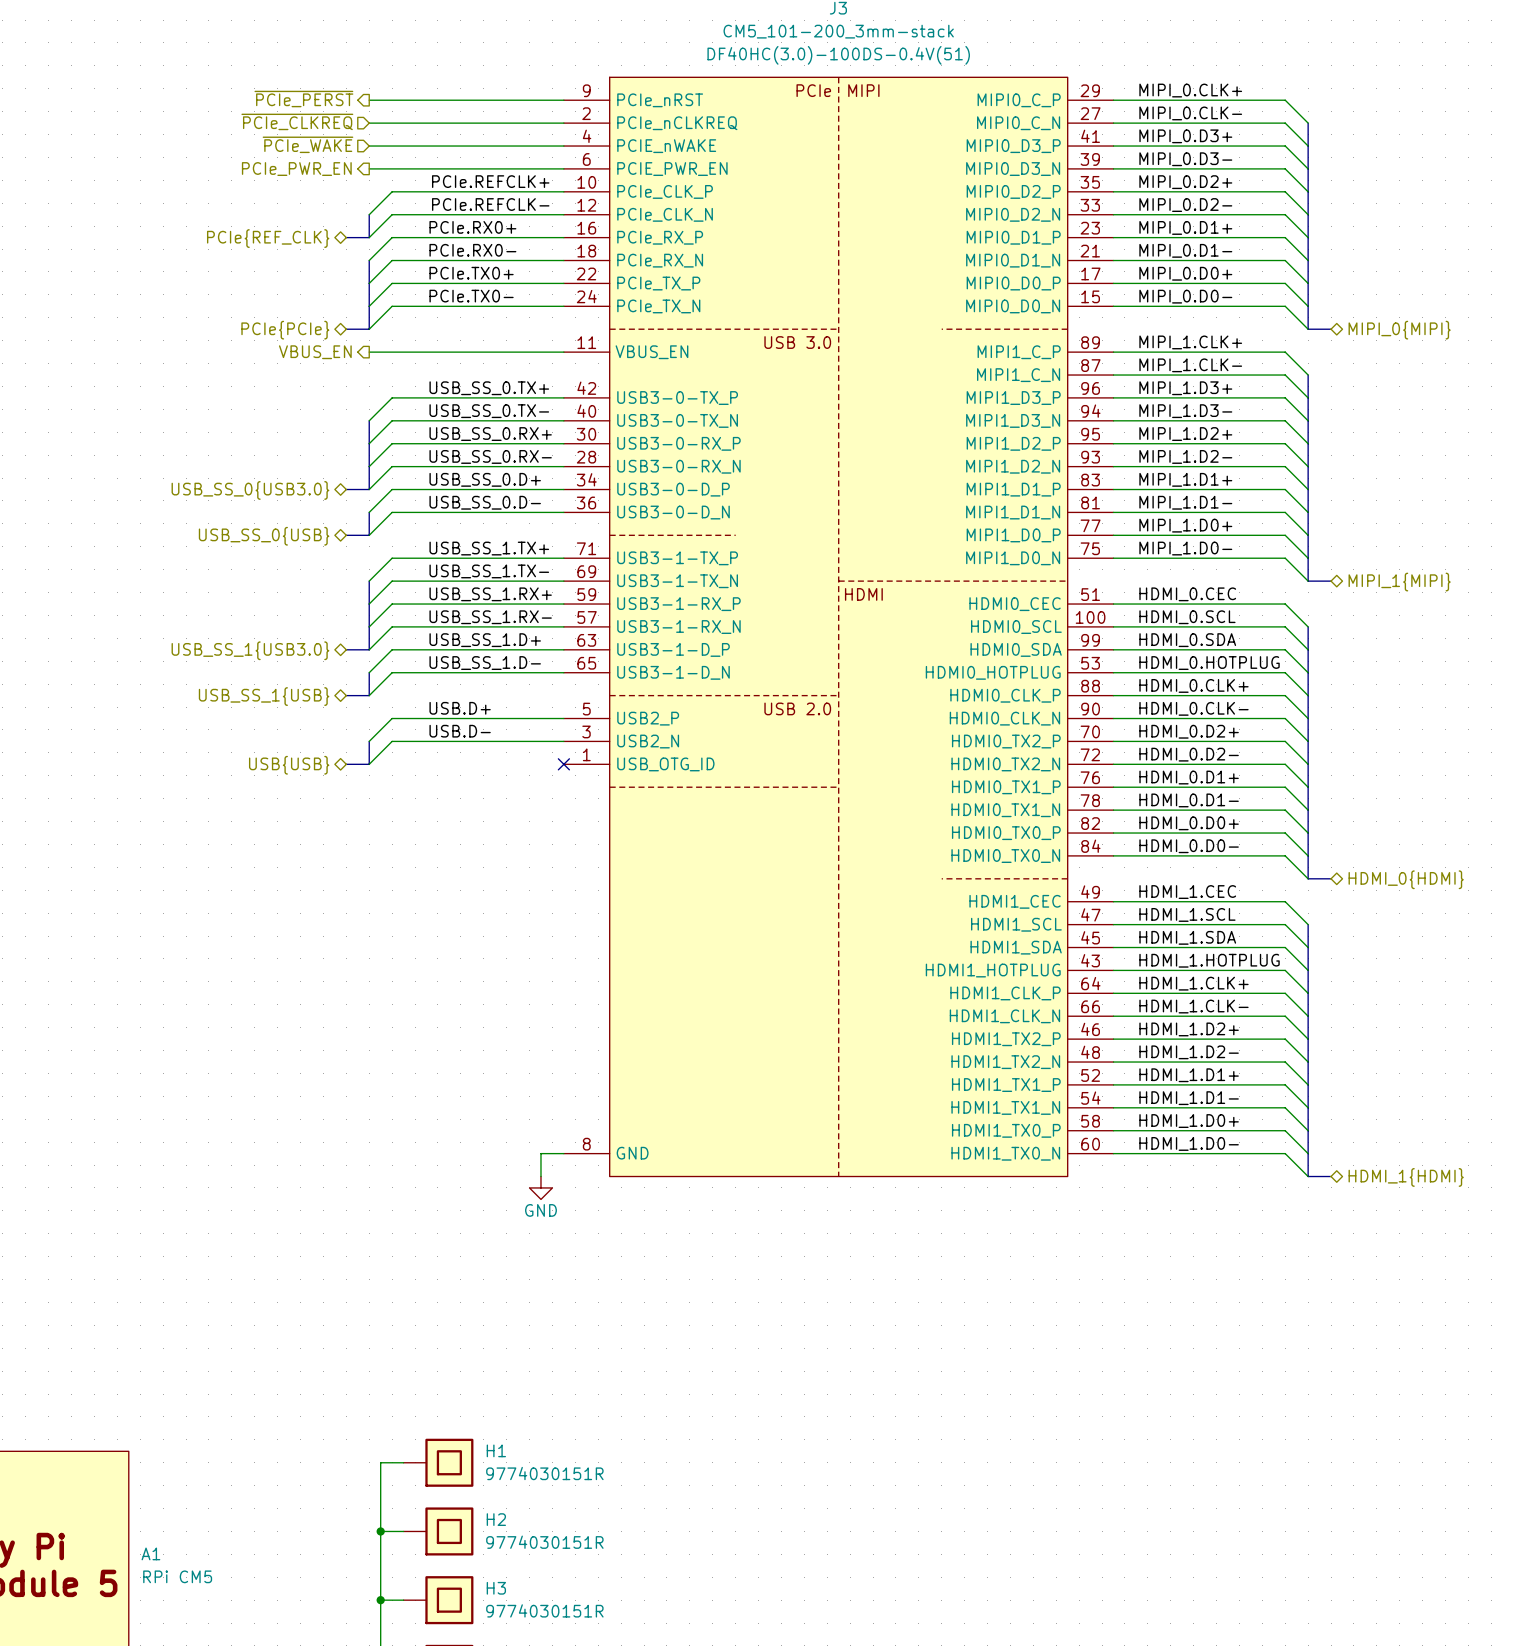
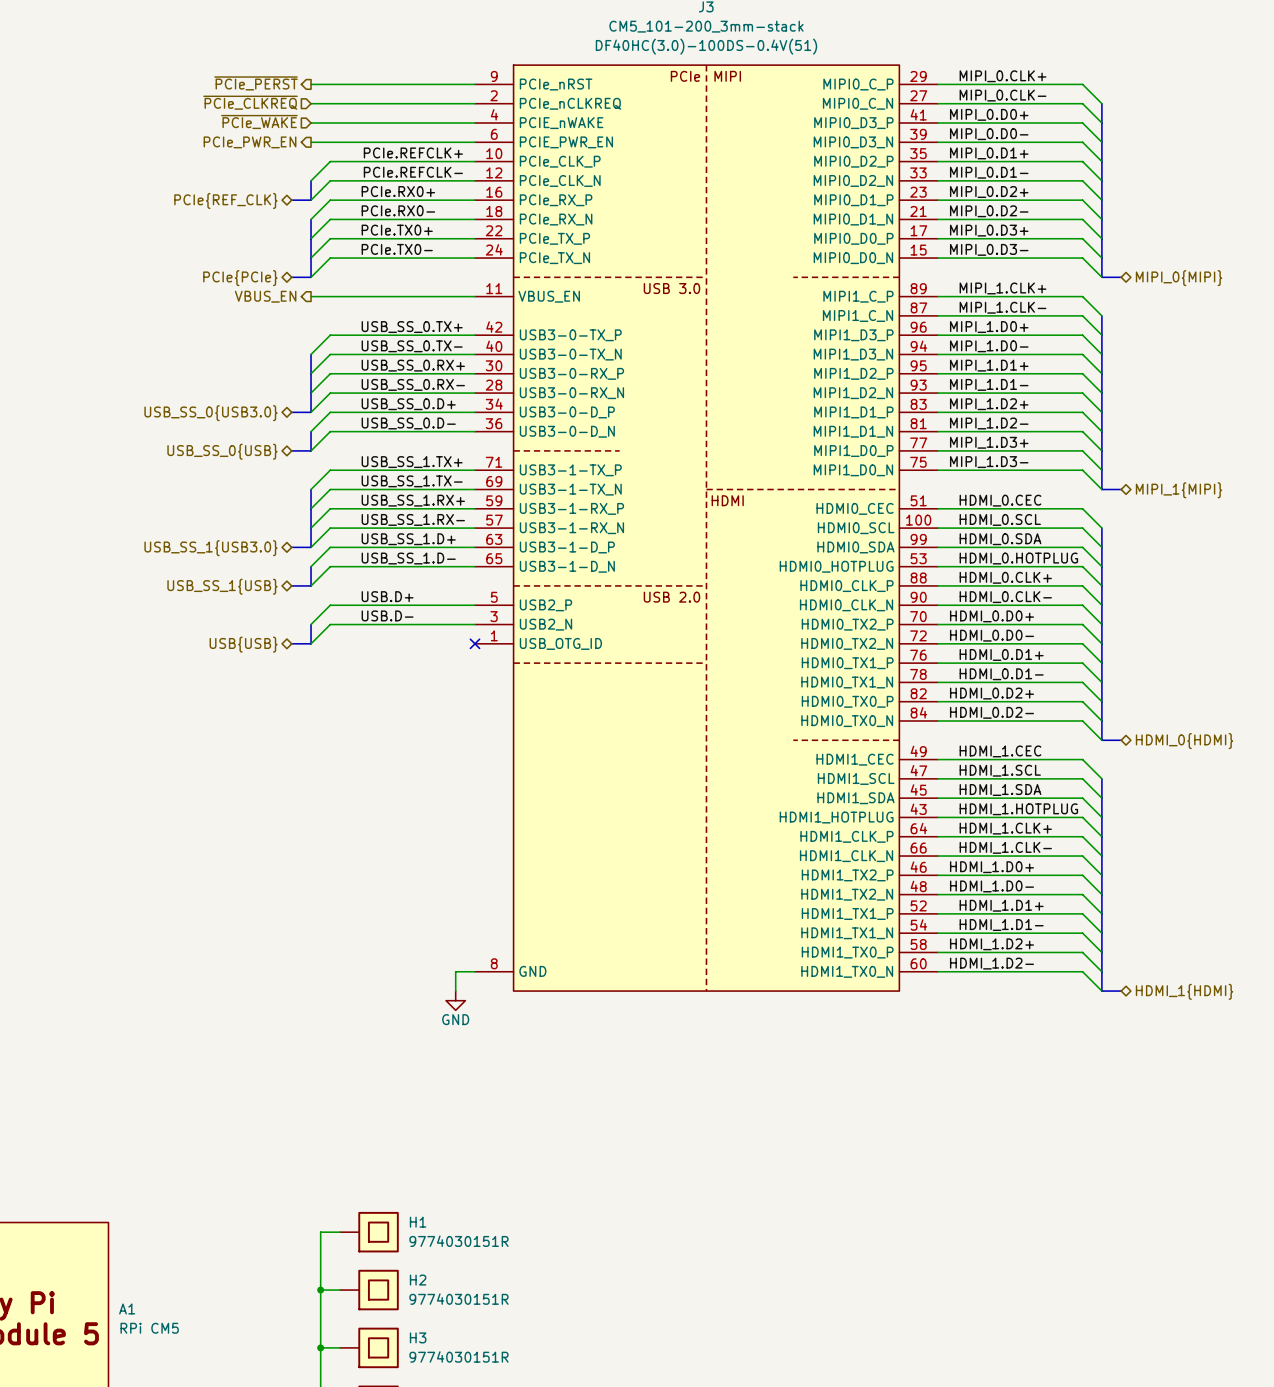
label position: MIPI_0.D3+ (1185, 136) -> MIPI_0.D3+ (989, 230)
label position: MIPI_0.D3- (1185, 159) -> MIPI_0.D3- (989, 249)
label position: MIPI_0.D2+ (1185, 182) -> MIPI_0.D2+ (989, 192)
label position: MIPI_0.D2- (1185, 205) -> MIPI_0.D2- (989, 211)
label position: MIPI_0.D1+ (1185, 227) -> MIPI_0.D1+ (989, 153)
label position: MIPI_0.D1- (1185, 250) -> MIPI_0.D1- (989, 172)
label position: MIPI_0.D0+ (1185, 273) -> MIPI_0.D0+ (989, 114)
label position: MIPI_0.D0- (1185, 296) -> MIPI_0.D0- (989, 134)
label position: MIPI_1.D3+ (1185, 388) -> MIPI_1.D3+ (989, 442)
label position: MIPI_1.D3- (1185, 411) -> MIPI_1.D3- (989, 462)
label position: MIPI_1.D2+ (1185, 434) -> MIPI_1.D2+ (989, 404)
label position: MIPI_1.D2- (1185, 456) -> MIPI_1.D2- (989, 423)
label position: MIPI_1.D1+ (1185, 479) -> MIPI_1.D1+ (989, 365)
label position: MIPI_1.D1- (1185, 502) -> MIPI_1.D1- (989, 384)
label position: MIPI_1.D0+ (1185, 525) -> MIPI_1.D0+ (989, 327)
label position: MIPI_1.D0- (1185, 548) -> MIPI_1.D0- (989, 346)
label position: HDMI_0.D2+ (1189, 731) -> HDMI_0.D2+ (991, 693)
label position: HDMI_0.D2- (1189, 754) -> HDMI_0.D2- (991, 712)
label position: HDMI_0.D0+ (1189, 823) -> HDMI_0.D0+ (991, 616)
label position: HDMI_0.D0- (1189, 846) -> HDMI_0.D0- (991, 635)
label position: HDMI_1.D2+ (1189, 1029) -> HDMI_1.D2+ (991, 944)
label position: HDMI_1.D2- (1189, 1052) -> HDMI_1.D2- (991, 963)
label position: HDMI_1.D0+ (1189, 1121) -> HDMI_1.D0+ (991, 867)
label position: HDMI_1.D0- (1189, 1143) -> HDMI_1.D0- (991, 886)

